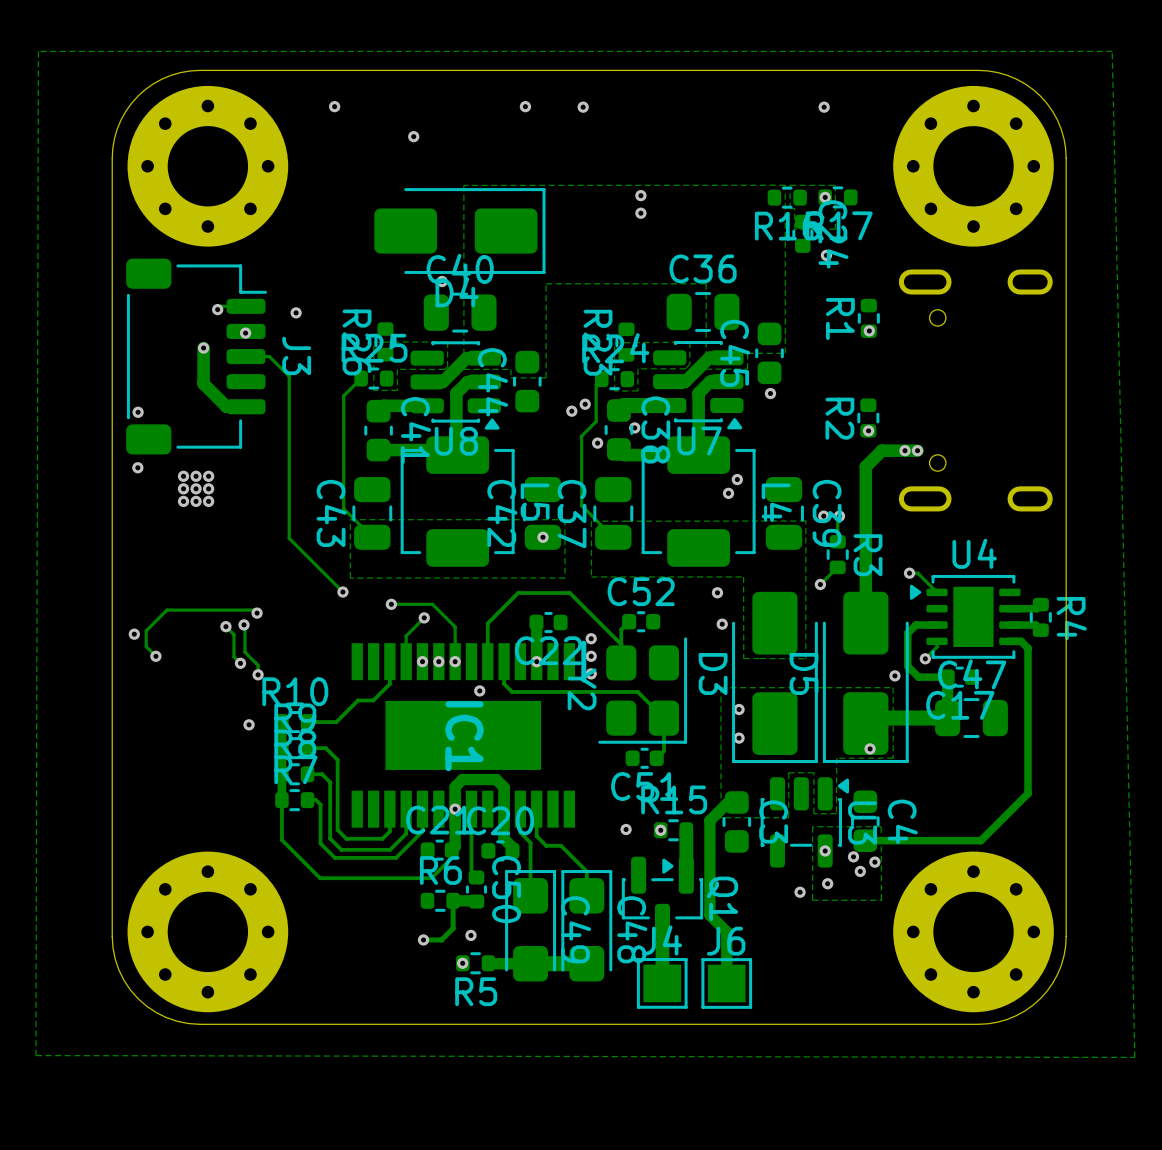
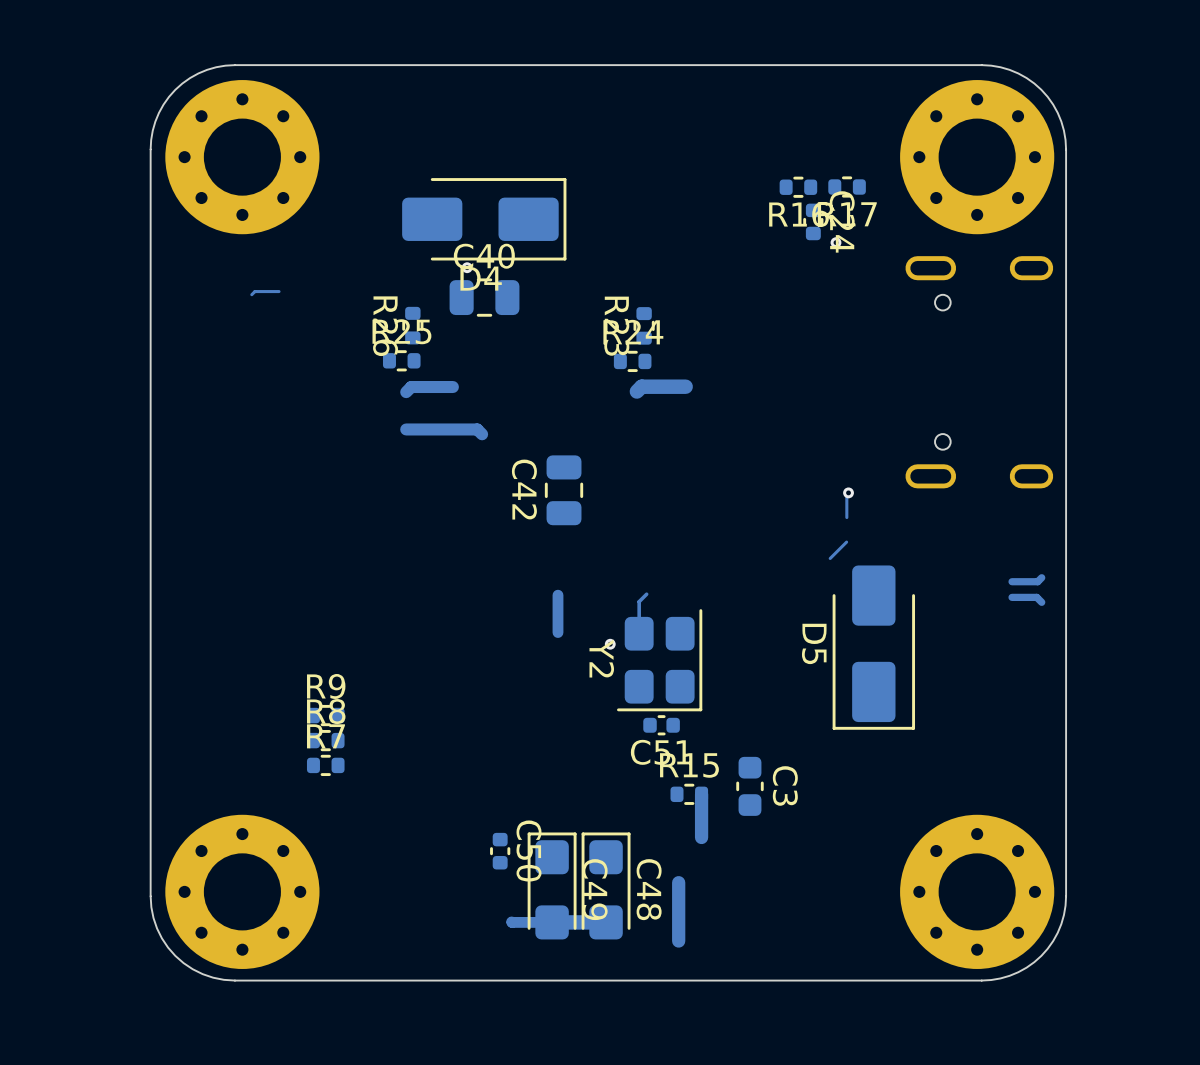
zone outline: (1112, 51) (1134, 1057) (35, 1055) (38, 51) (1112, 51) -> none
via: (334, 106) -> none
via: (525, 106) -> none
via: (583, 107) -> none
via: (824, 107) -> none
via: (413, 136) -> none
zone outline: (785, 185) (785, 353) (747, 353) (747, 369) (706, 369) (706, 283) (546, 283) (546, 377) (510, 377) (510, 369) (463, 369) (463, 185) (785, 185) -> none
zone outline: (835, 185) (790, 185) (790, 208) (794, 208) (794, 229) (835, 229) (835, 185) -> none
via: (640, 195) -> none
via: (825, 197) -> none
via: (640, 213) -> none
via: (217, 309) -> none
C36: (703, 311) -> none
via: (296, 312) -> none
R1: (868, 318) -> none
via: (869, 330) -> none
via: (245, 333) -> none
zone outline: (447, 341) (373, 342) (373, 390) (397, 390) (397, 369) (444, 369) (447, 367) (447, 341) -> none
zone outline: (689, 342) (614, 342) (614, 390) (637, 390) (637, 368) (685, 368) (689, 364) (689, 342) -> none
track: (203, 348) (203, 383) (226, 406) (246, 406) -> none
via: (203, 348) -> none
C45: (769, 353) -> none
J3: (196, 356) -> none
track: (246, 356) (269, 356) (289, 376) (289, 538) (342, 592) -> none
track: (726, 357) (709, 357) (685, 381) (669, 381) -> none
track: (484, 358) (466, 358) (442, 381) (427, 381) -> none
track: (361, 378) (343, 395) (343, 508) (372, 537) -> none
track: (601, 379) (596, 384) (596, 421) (581, 436) (581, 505) (613, 537) -> none
track: (484, 381) (467, 381) (456, 393) (456, 453) -> none
C44: (527, 381) -> none
track: (726, 381) (710, 381) (698, 393) (698, 455) (624, 455) (618, 449) -> none
U8: (455, 385) -> none
U7: (698, 385) -> none
via: (770, 393) -> none
via: (585, 404) -> none
via: (571, 411) -> none
via: (138, 412) -> none
R2: (868, 418) -> none
via: (634, 427) -> none
C38: (618, 429) -> none
C41: (378, 430) -> none
via: (868, 430) -> none
via: (597, 443) -> none
via: (904, 450) -> none
track: (917, 450) (881, 450) (865, 466) (865, 623) -> none
via: (917, 450) -> none
via: (137, 467) -> none
via: (183, 476) -> none
via: (196, 476) -> none
via: (208, 476) -> none
via: (737, 479) -> none
via: (183, 488) -> none
via: (196, 488) -> none
via: (208, 488) -> none
via: (728, 493) -> none
via: (183, 501) -> none
via: (196, 501) -> none
via: (208, 501) -> none
L5: (457, 501) -> none
L4: (698, 501) -> none
C43: (372, 513) -> none
C37: (613, 513) -> none
C39: (783, 513) -> none
via: (823, 516) -> none
zone outline: (564, 519) (350, 519) (350, 578) (564, 578) (564, 519) -> none
zone outline: (805, 520) (805, 658) (743, 658) (743, 576) (591, 576) (591, 521) (805, 520) -> none
via: (543, 537) -> none
R3: (837, 554) -> none
track: (909, 573) (917, 573) (937, 592) -> none
via: (909, 573) -> none
via: (820, 584) -> none
via: (342, 592) -> none
via: (717, 592) -> none
track: (391, 604) (432, 604) (455, 626) (455, 661) -> none
via: (391, 604) -> none
track: (257, 613) (254, 610) (166, 610) (146, 630) (146, 646) (155, 656) -> none
via: (257, 613) -> none
U4: (965, 616) -> none
track: (424, 617) (406, 635) (406, 661) -> none
via: (424, 617) -> none
R4: (1040, 617) -> none
C52: (641, 621) -> none
C22: (548, 622) -> none
track: (244, 624) (245, 652) (258, 665) (258, 674) -> none
via: (244, 624) -> none
via: (722, 624) -> none
track: (937, 625) (915, 625) (907, 633) (907, 666) (918, 677) (947, 677) (947, 718) (871, 718) (865, 723) -> none
track: (225, 626) (233, 634) (233, 656) (240, 663) -> none
via: (225, 626) -> none
via: (134, 634) -> none
via: (591, 638) -> none
track: (937, 641) (937, 647) (925, 658) -> none
track: (1009, 641) (1021, 641) (1028, 648) (1028, 793) (980, 840) (865, 840) -> none
track: (621, 644) (569, 593) (518, 593) (487, 623) (487, 661) -> none
via: (155, 656) -> none
via: (591, 656) -> none
via: (925, 658) -> none
track: (389, 661) (389, 683) (373, 700) (357, 700) (336, 722) (307, 722) -> none
via: (422, 661) -> none
via: (438, 661) -> none
via: (455, 661) -> none
track: (504, 661) (504, 683) (512, 691) (637, 691) (664, 718) (664, 751) (656, 758) -> none
via: (536, 661) -> none
via: (240, 663) -> none
via: (258, 674) -> none
via: (894, 675) -> none
D3: (774, 677) -> none
C17: (959, 677) -> none
zone outline: (893, 687) (720, 687) (720, 817) (788, 817) (788, 772) (813, 772) (813, 813) (836, 813) (836, 758) (893, 758) (893, 687) -> none
via: (479, 690) -> none
via: (739, 709) -> none
C47: (971, 718) -> none
track: (281, 722) (281, 840) (320, 878) (431, 878) (451, 857) (451, 850) (455, 846) (455, 786) (462, 779) (496, 779) (504, 787) (504, 838) (512, 847) (512, 850) -> none
R10: (294, 722) -> none
via: (249, 724) -> none
IC1: (468, 734) -> none
via: (739, 738) -> none
track: (307, 748) (325, 748) (337, 759) (337, 830) (346, 838) (382, 838) (389, 831) (389, 809) -> none
via: (870, 748) -> none
track: (307, 774) (322, 774) (330, 782) (330, 838) (341, 849) (390, 849) (406, 833) (406, 809) -> none
track: (307, 800) (316, 800) (320, 804) (320, 843) (334, 857) (396, 857) (422, 831) (422, 809) -> none
track: (736, 802) (728, 802) (709, 820) (709, 915) (726, 931) (726, 983) -> none
via: (455, 809) -> none
track: (471, 809) (471, 872) (476, 877) -> none
track: (520, 809) (520, 832) (530, 842) (530, 895) -> none
track: (536, 809) (536, 836) (546, 845) (561, 845) (586, 871) (586, 895) -> none
C4: (865, 821) -> none
U3: (804, 822) -> none
zone outline: (881, 826) (812, 826) (812, 900) (881, 900) (881, 826) -> none
via: (626, 829) -> none
via: (660, 830) -> none
C21: (439, 850) -> none
C20: (500, 850) -> none
via: (825, 850) -> none
via: (853, 856) -> none
via: (874, 862) -> none
via: (860, 871) -> none
via: (827, 883) -> none
via: (800, 892) -> none
Q1: (662, 898) -> none
R6: (440, 900) -> none
track: (476, 901) (453, 900) (453, 928) (441, 939) (423, 939) -> none
via: (470, 935) -> none
via: (423, 939) -> none
via: (462, 963) -> none
R5: (475, 963) -> none
J4: (662, 983) -> none
J6: (726, 983) -> none

